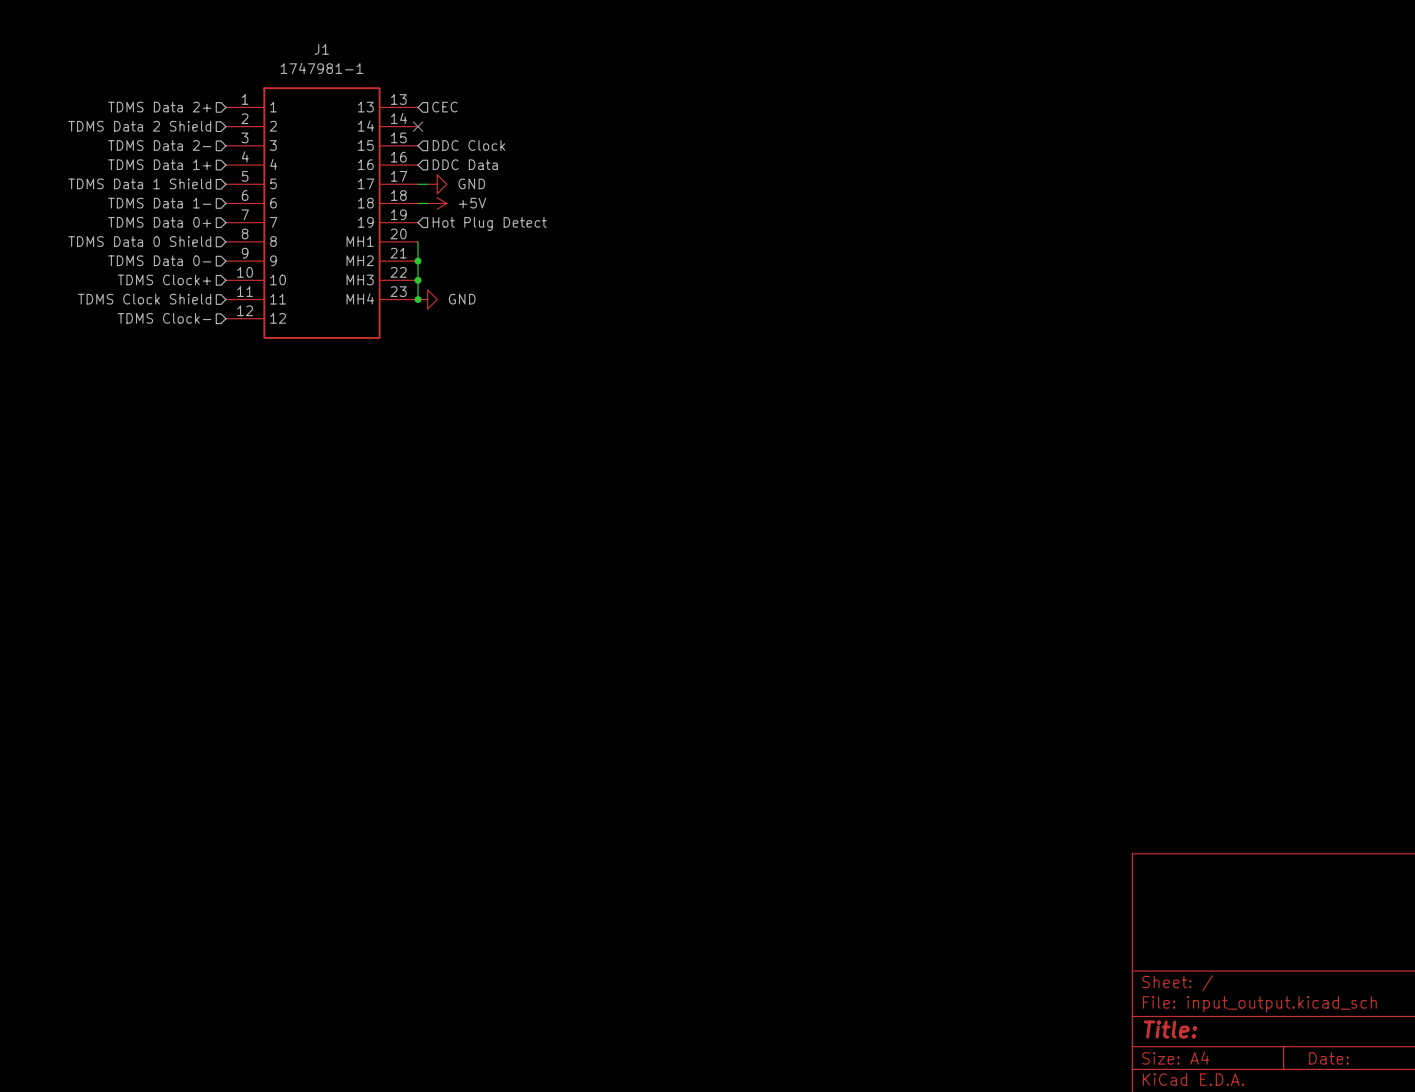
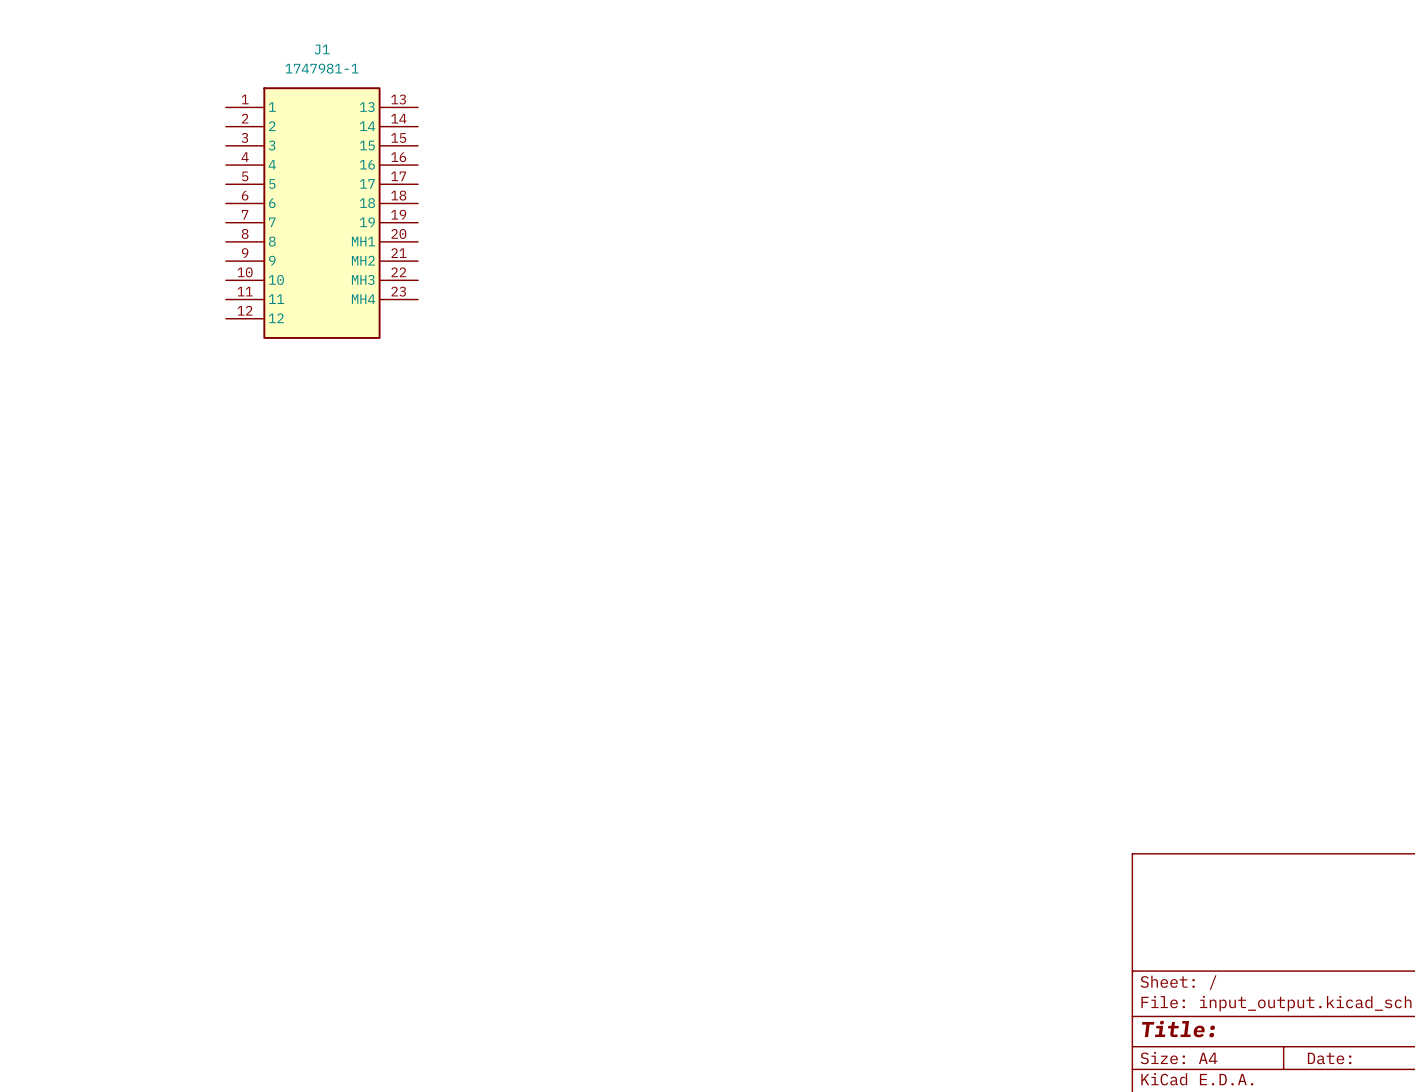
hierarchical label: TDMS Data 2+ (159, 107) -> none
hierarchical label: CEC (444, 107) -> none
hierarchical label: TDMS Data 2 Shield (139, 126) -> none
no-connect mark: (418, 126) -> none
hierarchical label: TDMS Data 2- (159, 145) -> none
hierarchical label: DDC Clock (468, 145) -> none
hierarchical label: TDMS Data 1+ (159, 164) -> none
hierarchical label: DDC Data (465, 164) -> none
hierarchical label: TDMS Data 1 Shield (139, 183) -> none
wire: (418, 184) (427, 184) -> none
power symbol: GND (437, 184) -> none
hierarchical label: TDMS Data 1- (159, 203) -> none
wire: (418, 203) (427, 203) -> none
power symbol: +5V (437, 203) -> none
hierarchical label: TDMS Data 0+ (159, 222) -> none
hierarchical label: Hot Plug Detect (489, 223) -> none
hierarchical label: TDMS Data 0 Shield (139, 241) -> none
wire: (418, 241) (418, 299) -> none
hierarchical label: TDMS Data 0- (159, 260) -> none
junction: (418, 261) -> none
hierarchical label: TDMS Clock+ (164, 279) -> none
junction: (418, 280) -> none
hierarchical label: TDMS Clock Shield (144, 299) -> none
junction: (418, 299) -> none
power symbol: GND (427, 299) -> none
hierarchical label: TDMS Clock- (164, 318) -> none

